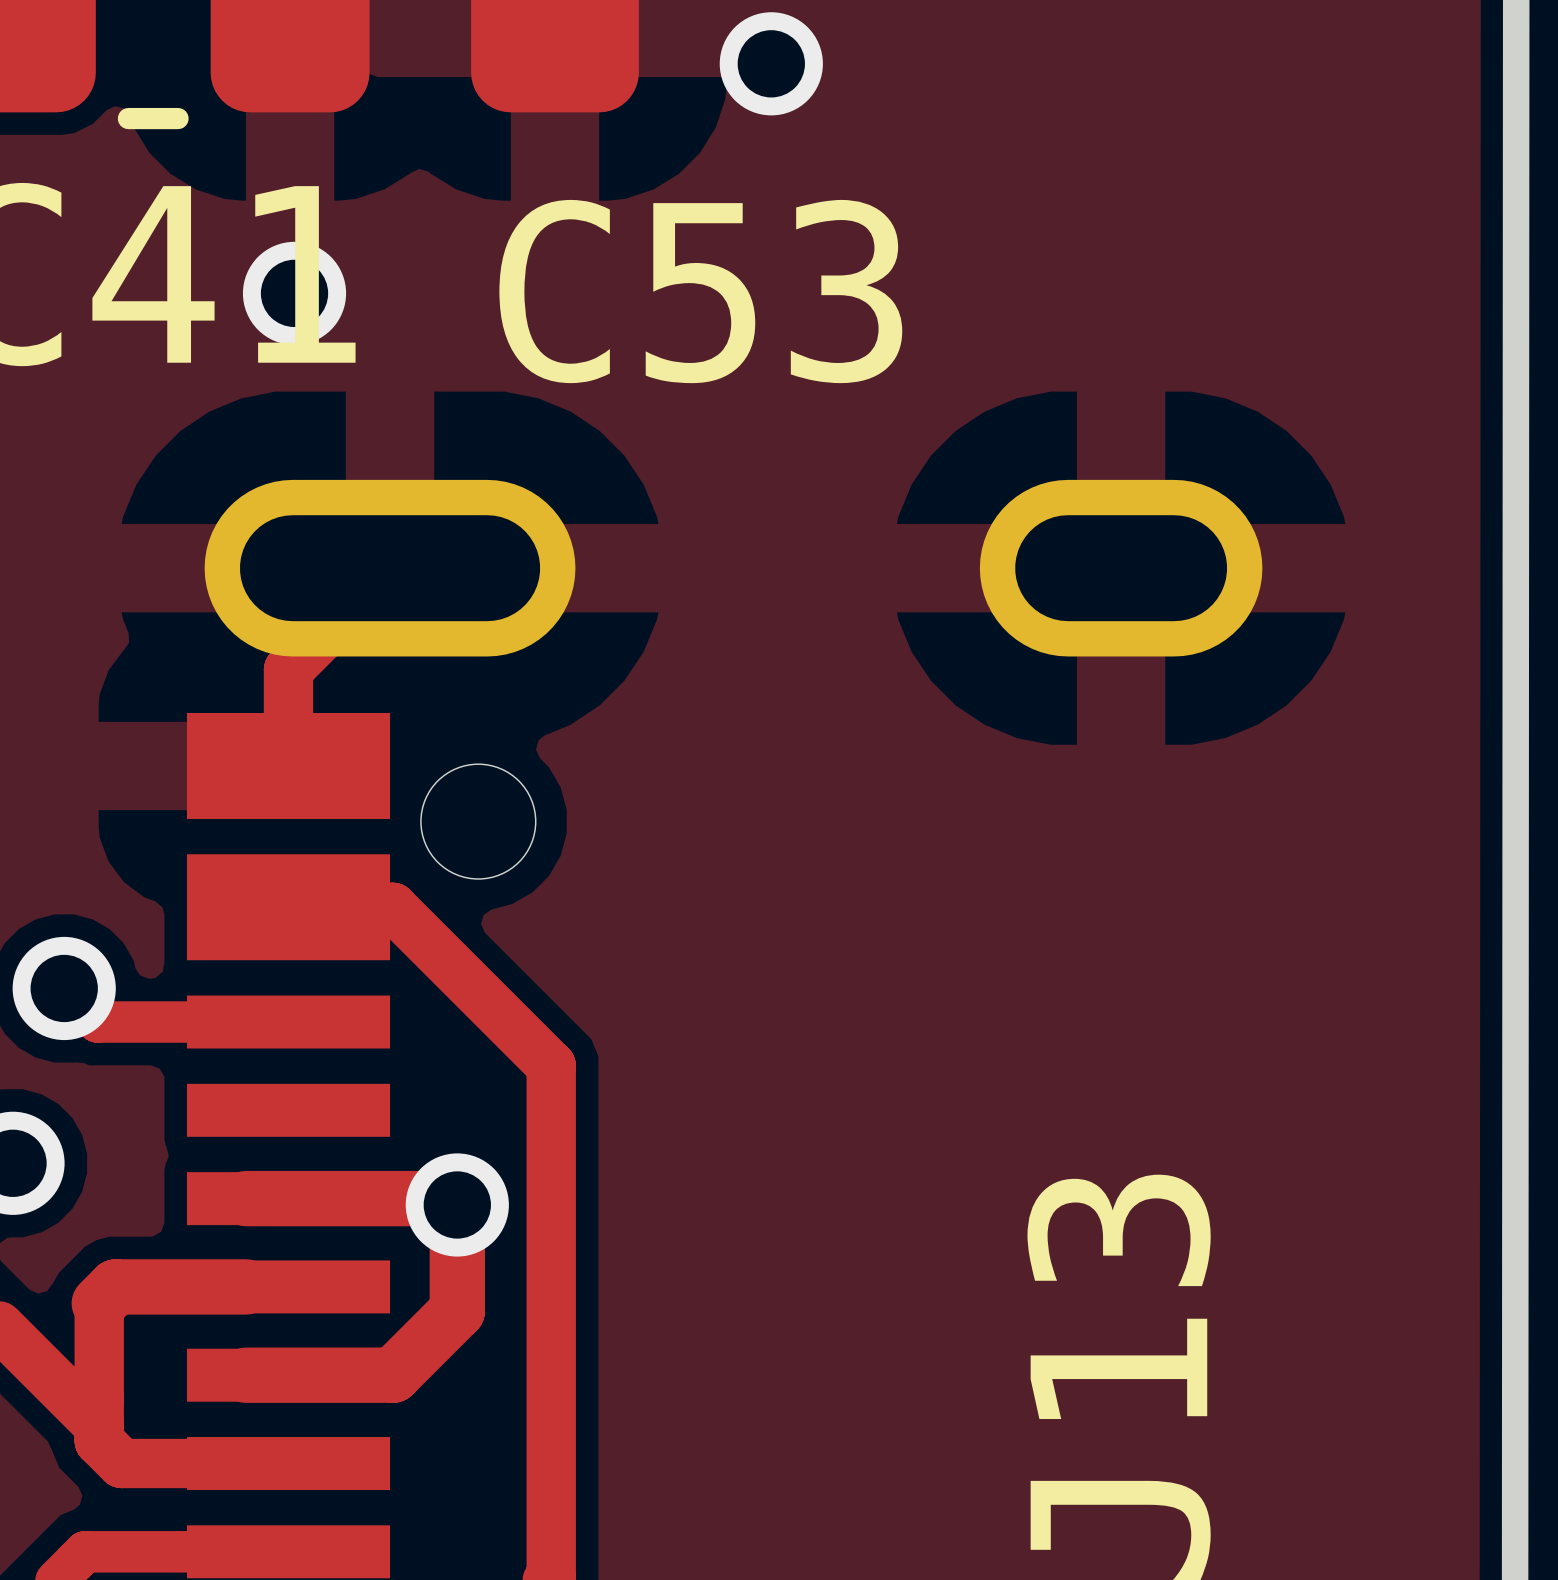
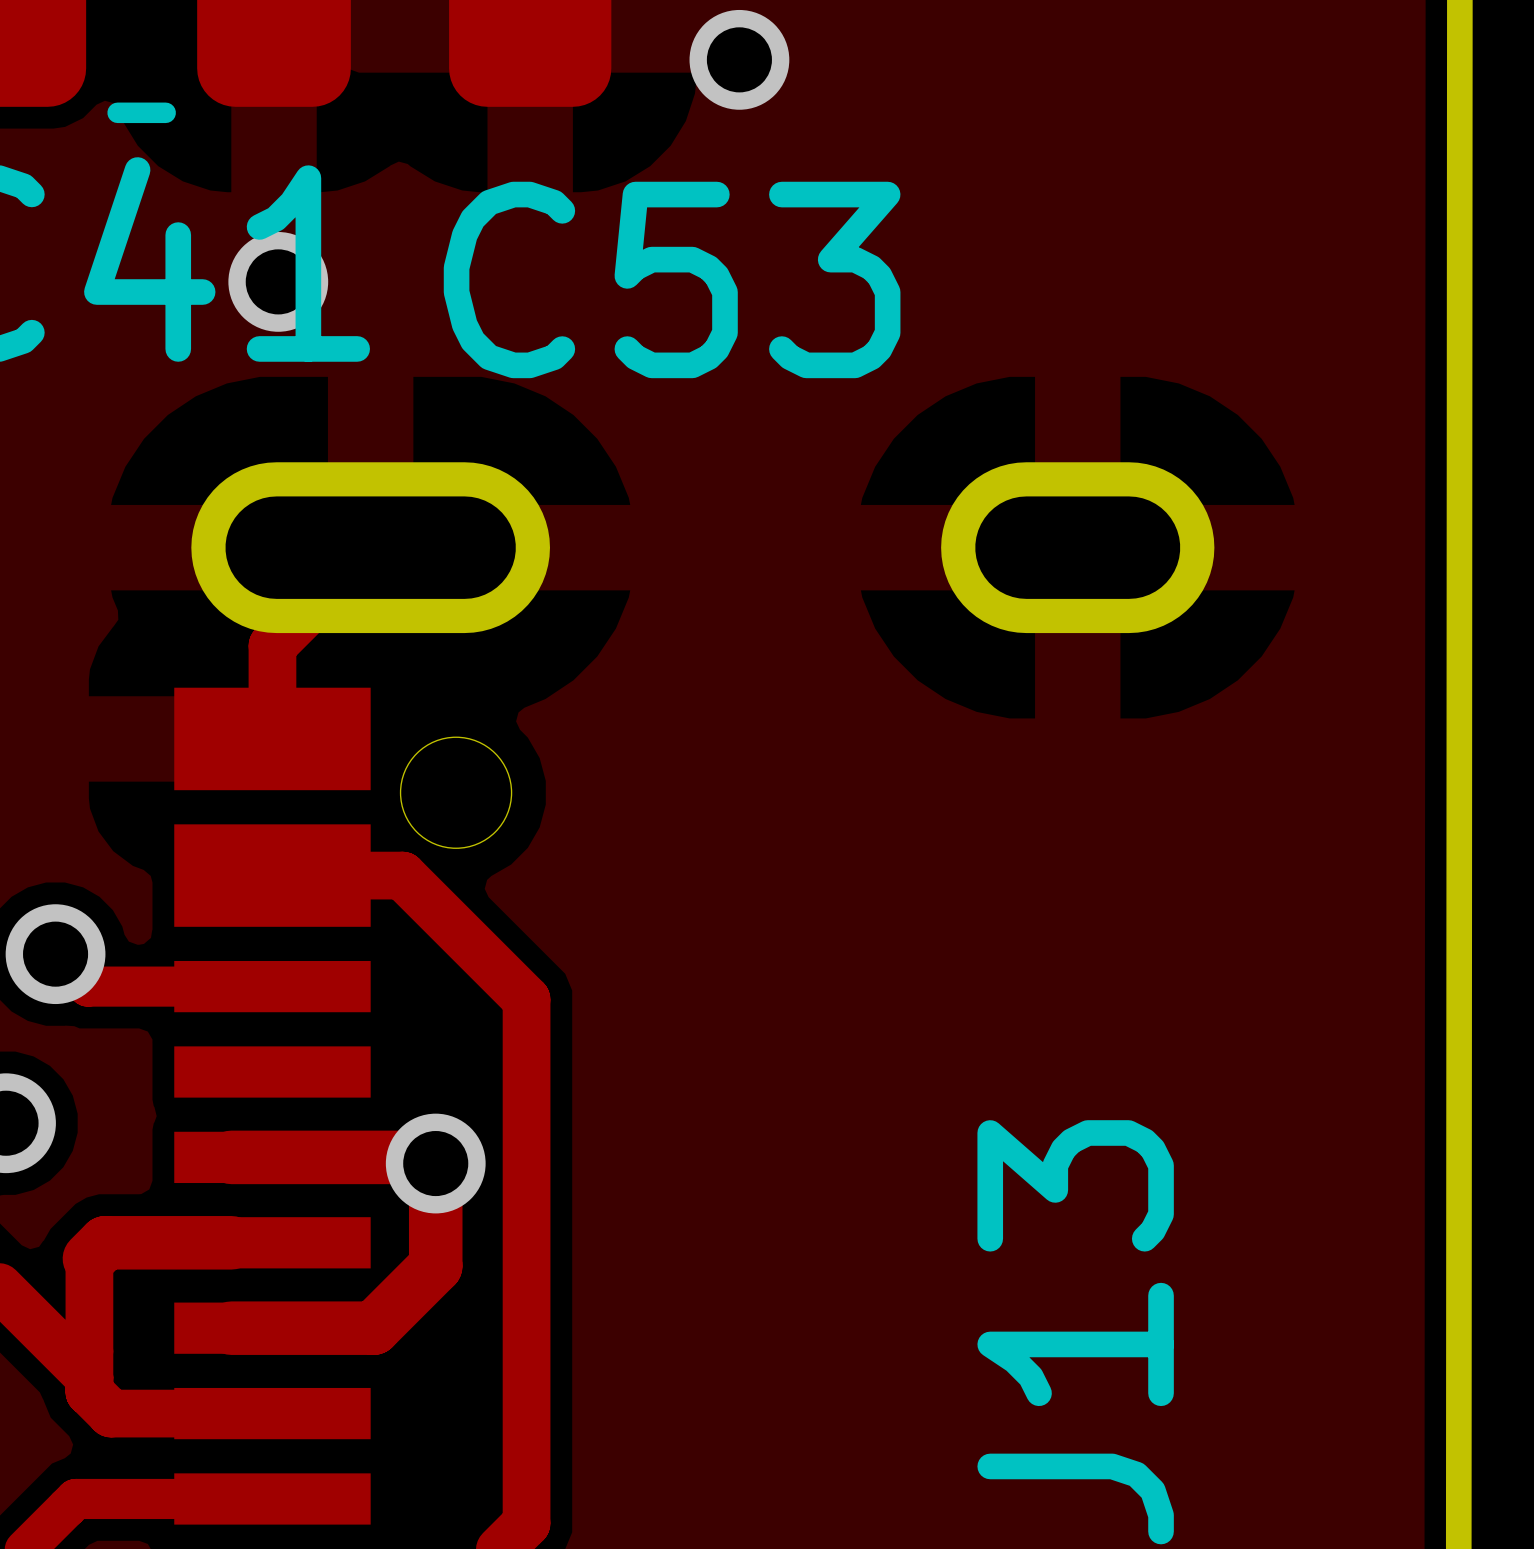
track: (392, 907) (551, 1065) -> (373, 875) (402, 875) (526, 999) (526, 1028)

